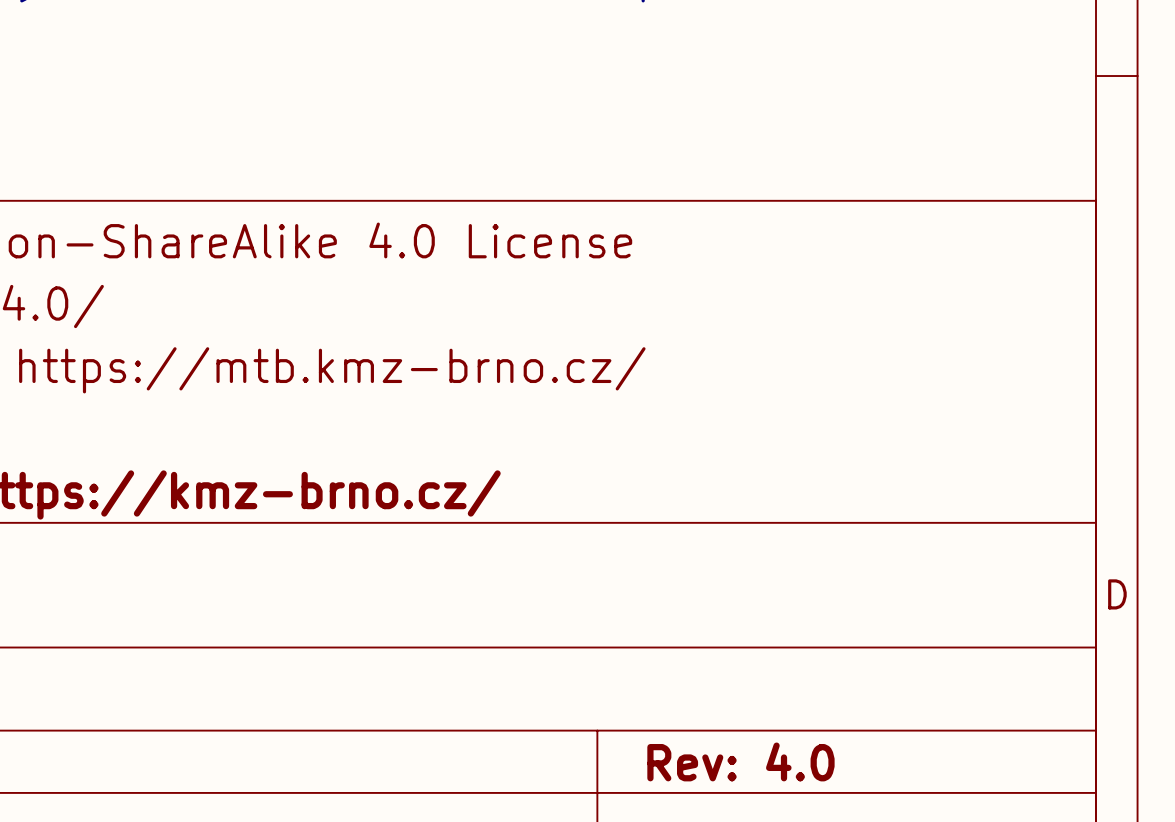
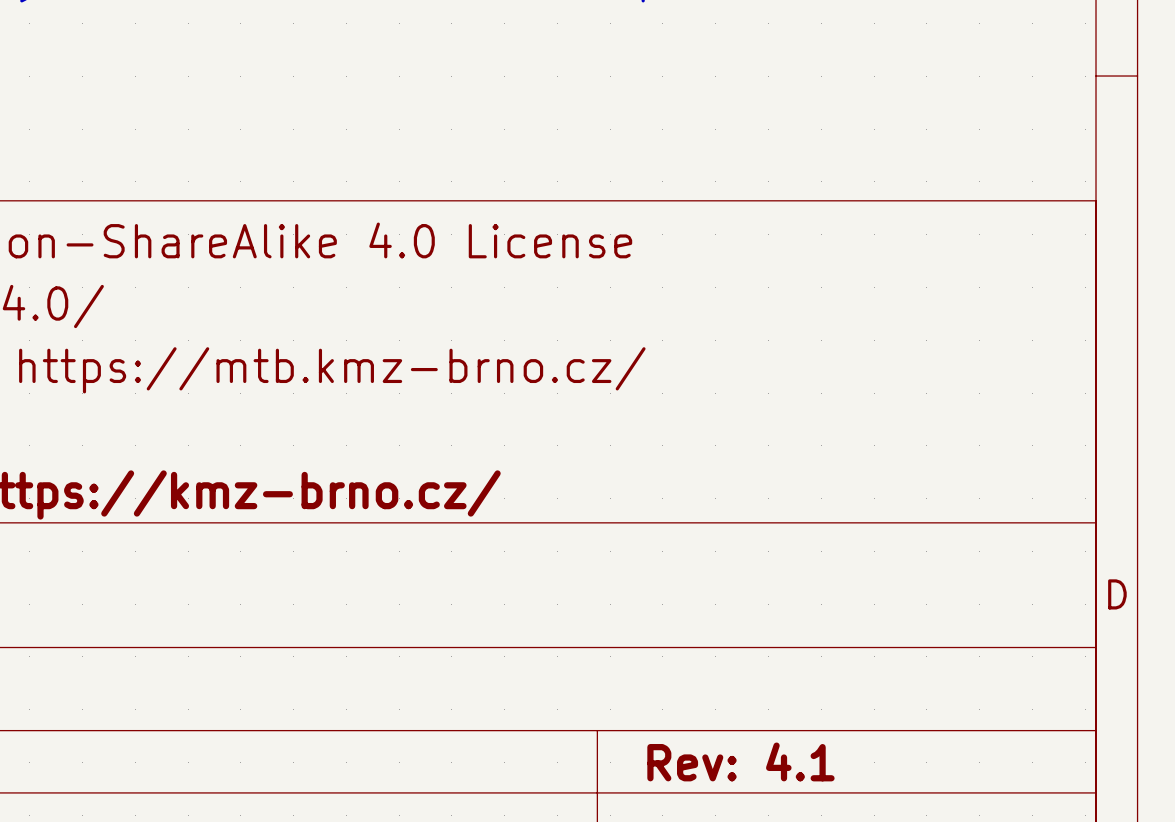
title block: Rev: 4.0 (740, 761) -> Rev: 4.1 (740, 761)

